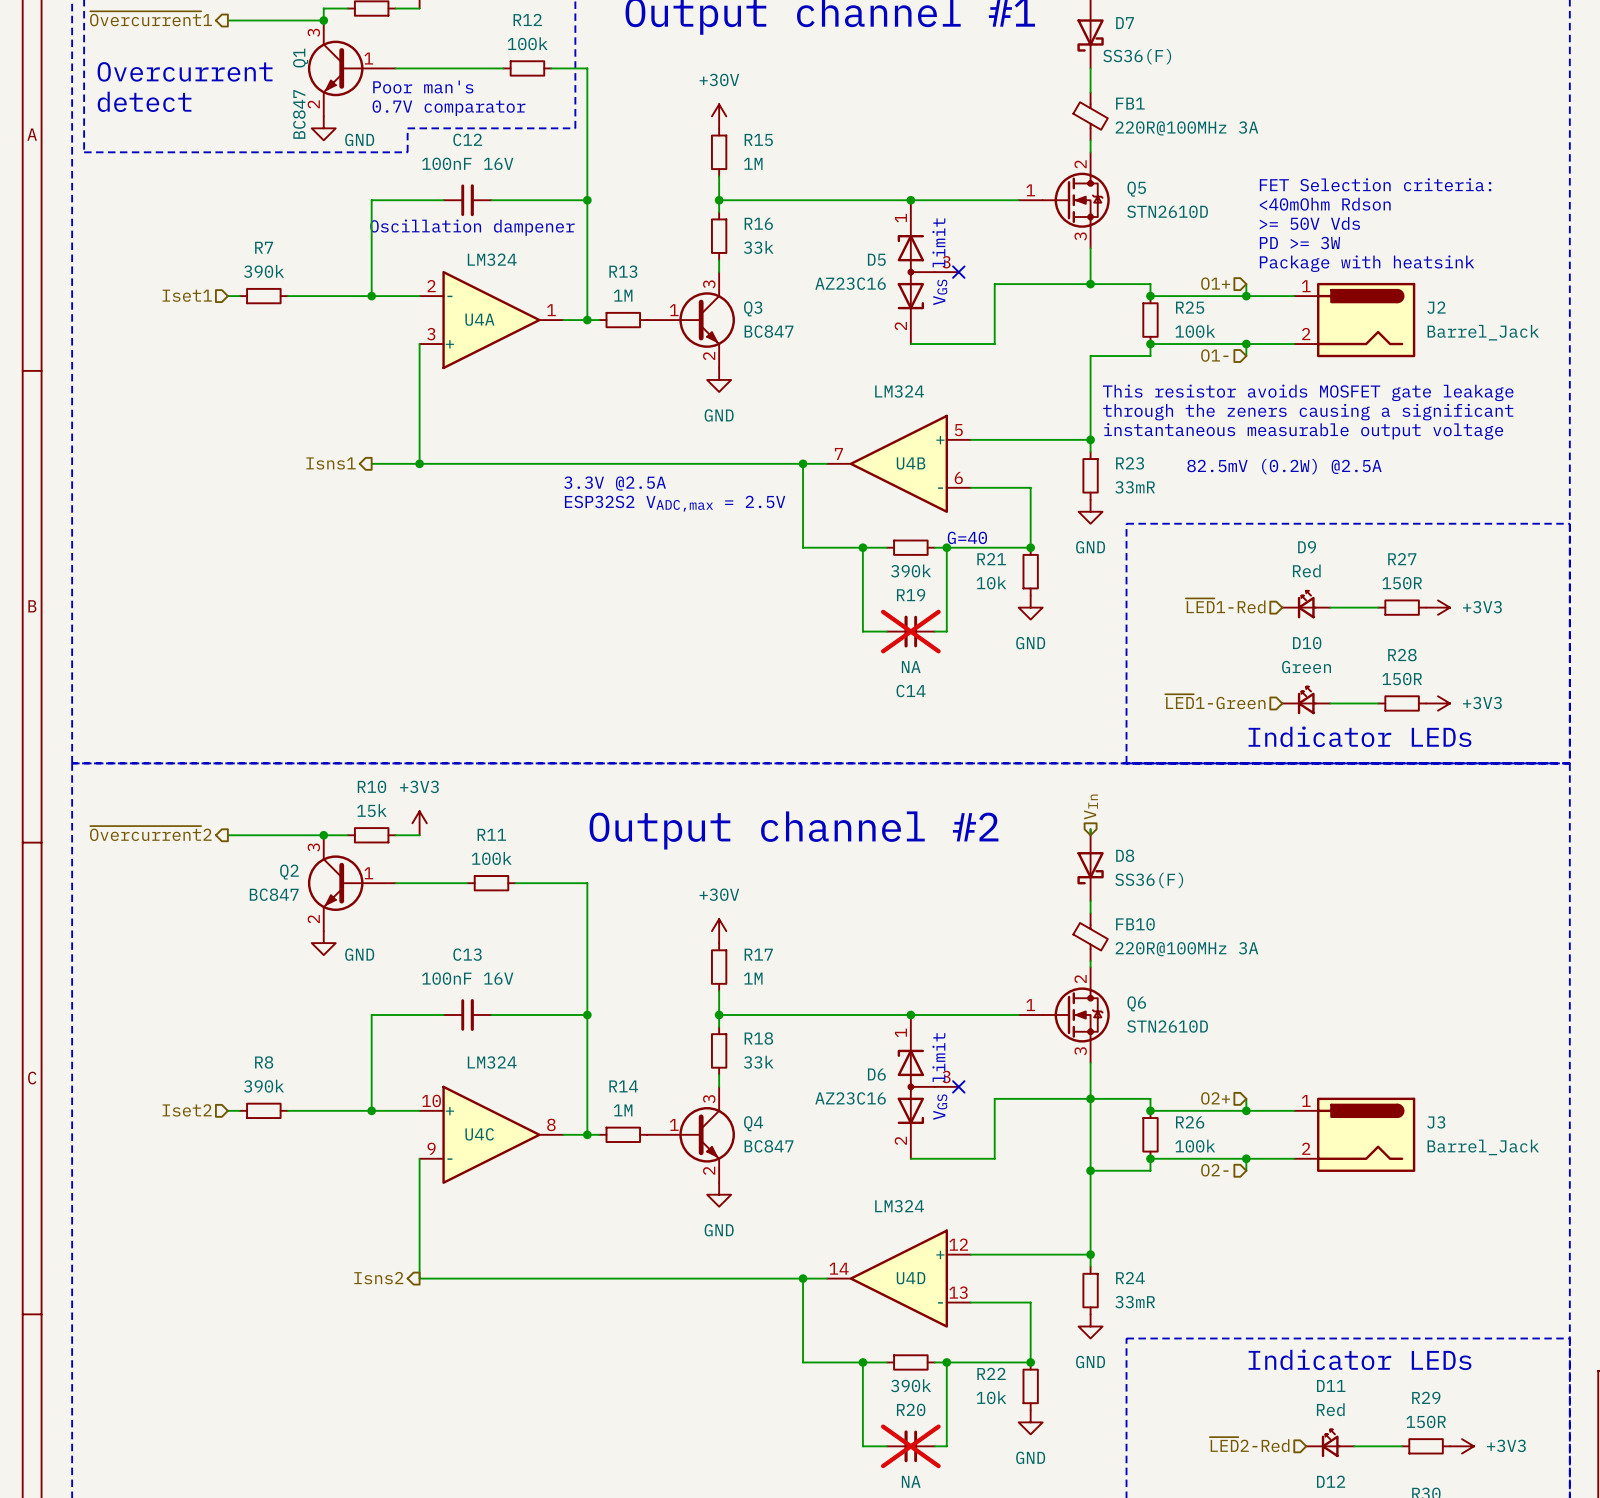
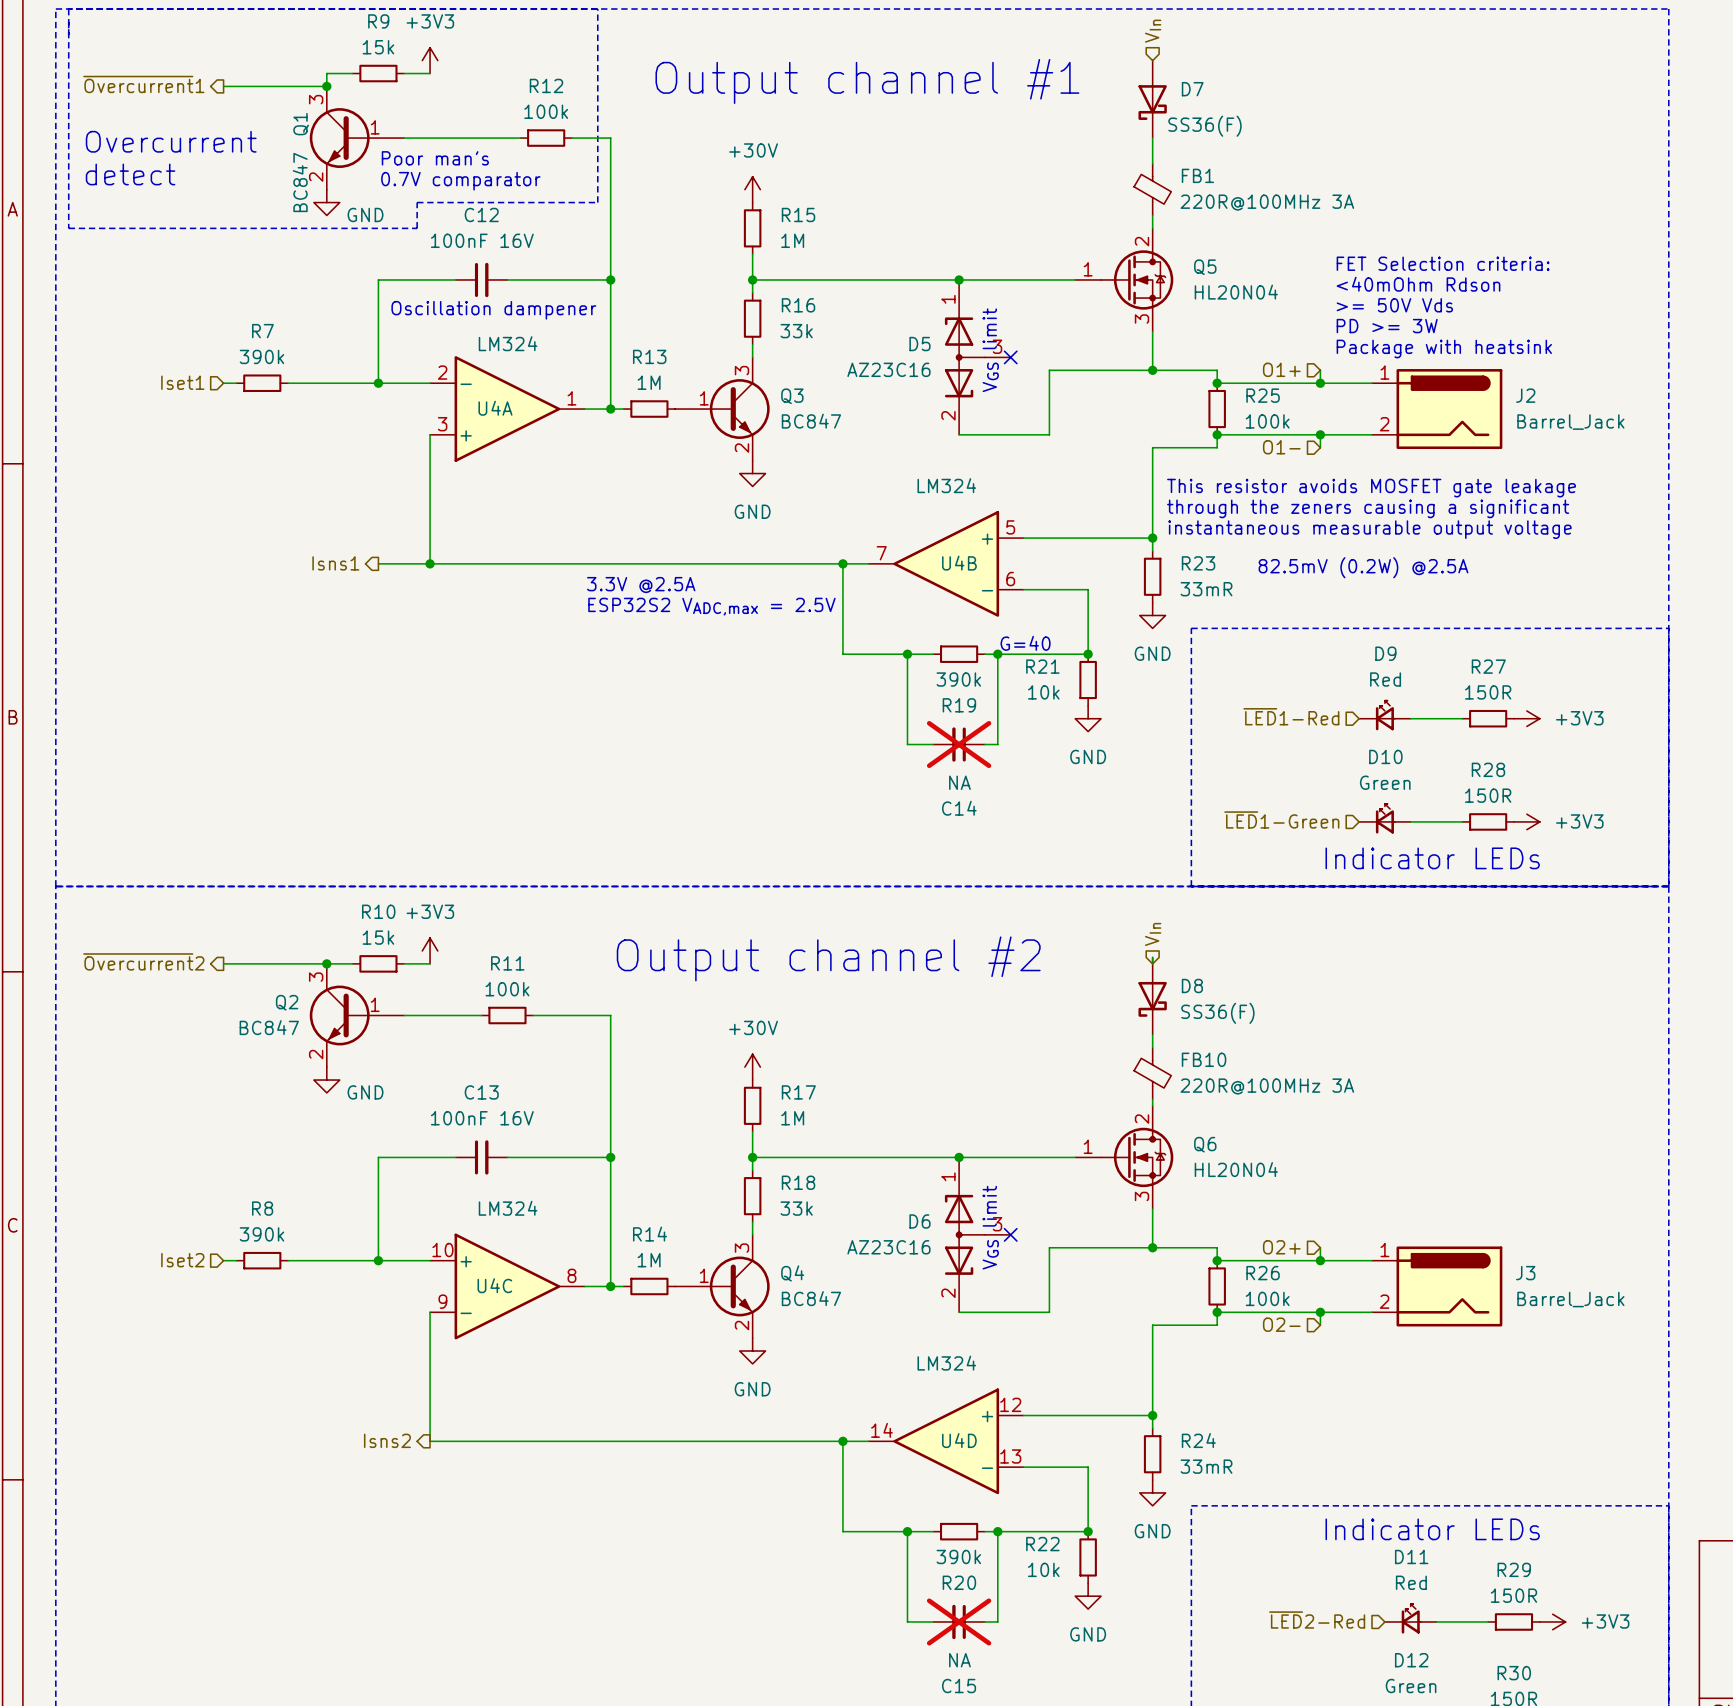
Q5 value: STN2610D (1167, 211) -> HL20N04 (1236, 292)
Q6 value: STN2610D (1167, 1026) -> HL20N04 (1236, 1169)
wire: (1090, 1098) (1090, 1170) -> none
junction: (1090, 1170) -> none

